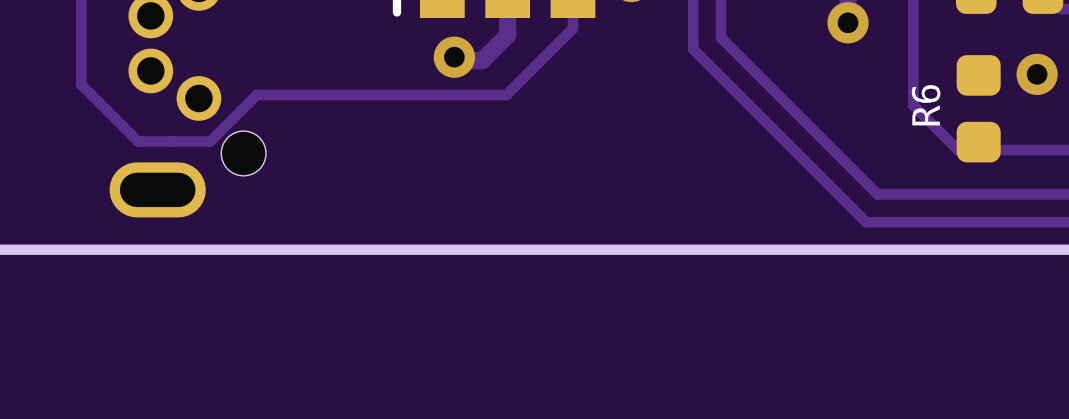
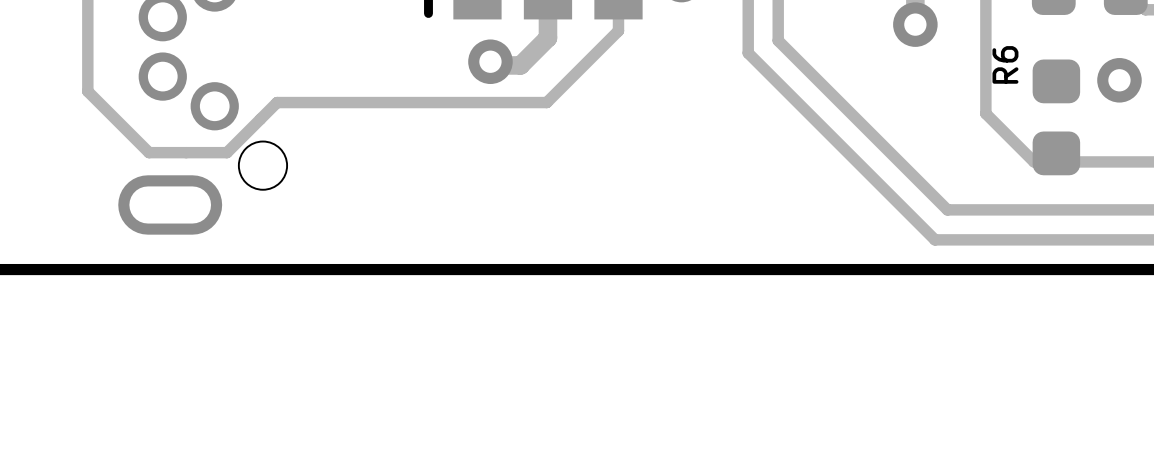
R6 name position: R6 (926, 105) -> R6 (1005, 64)

